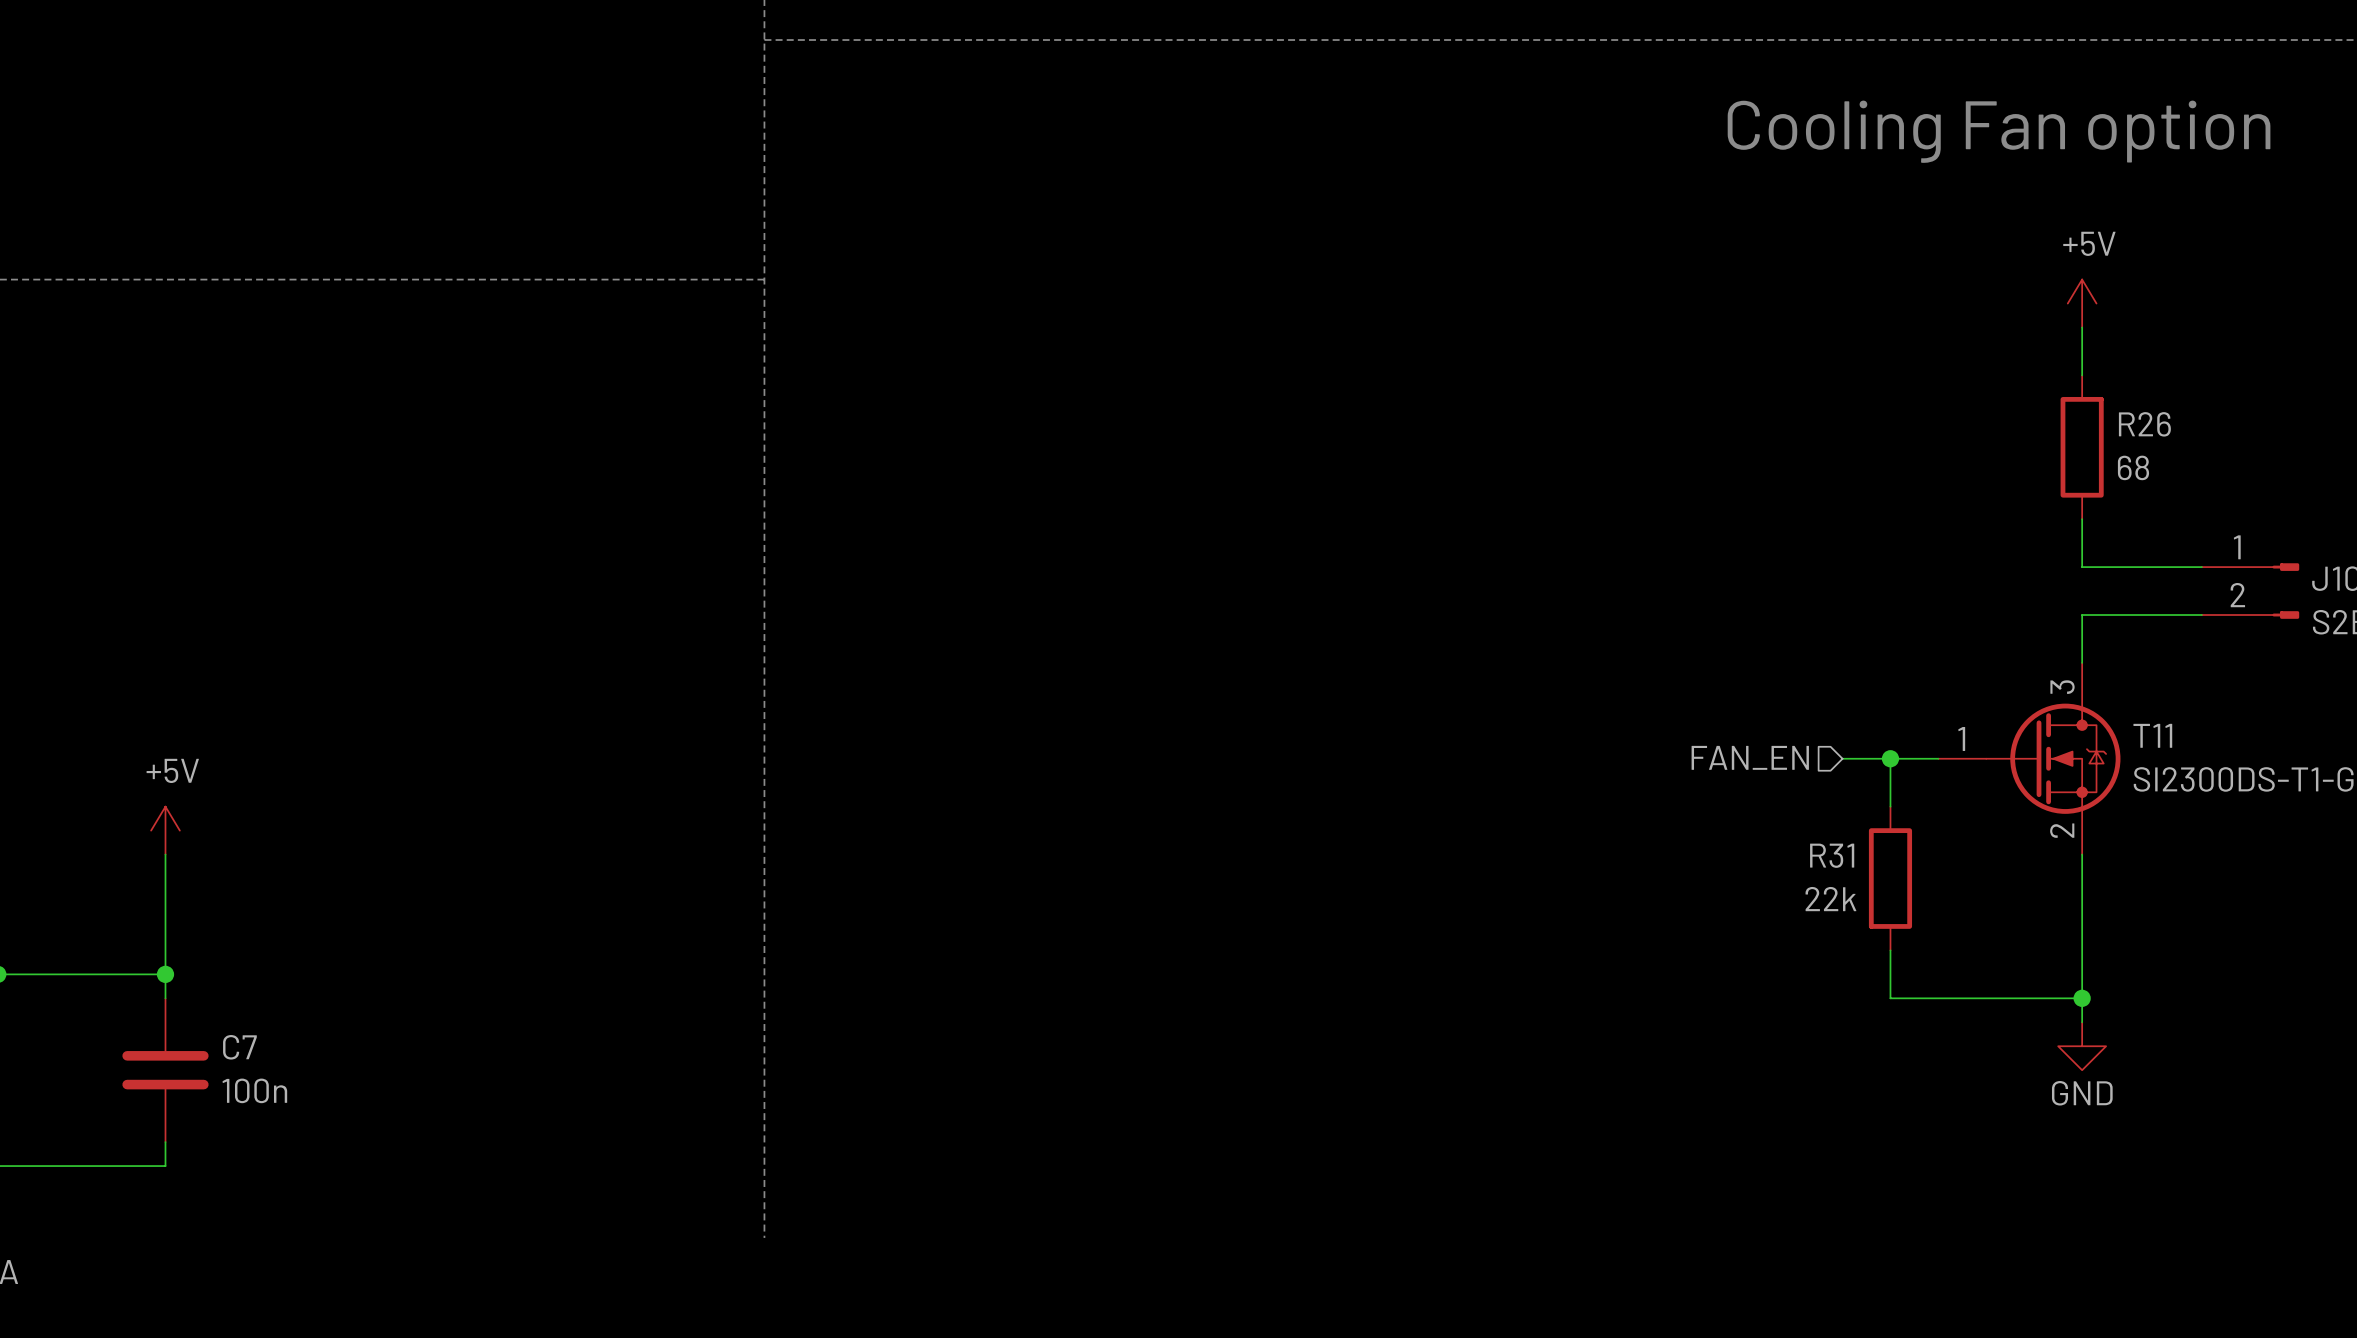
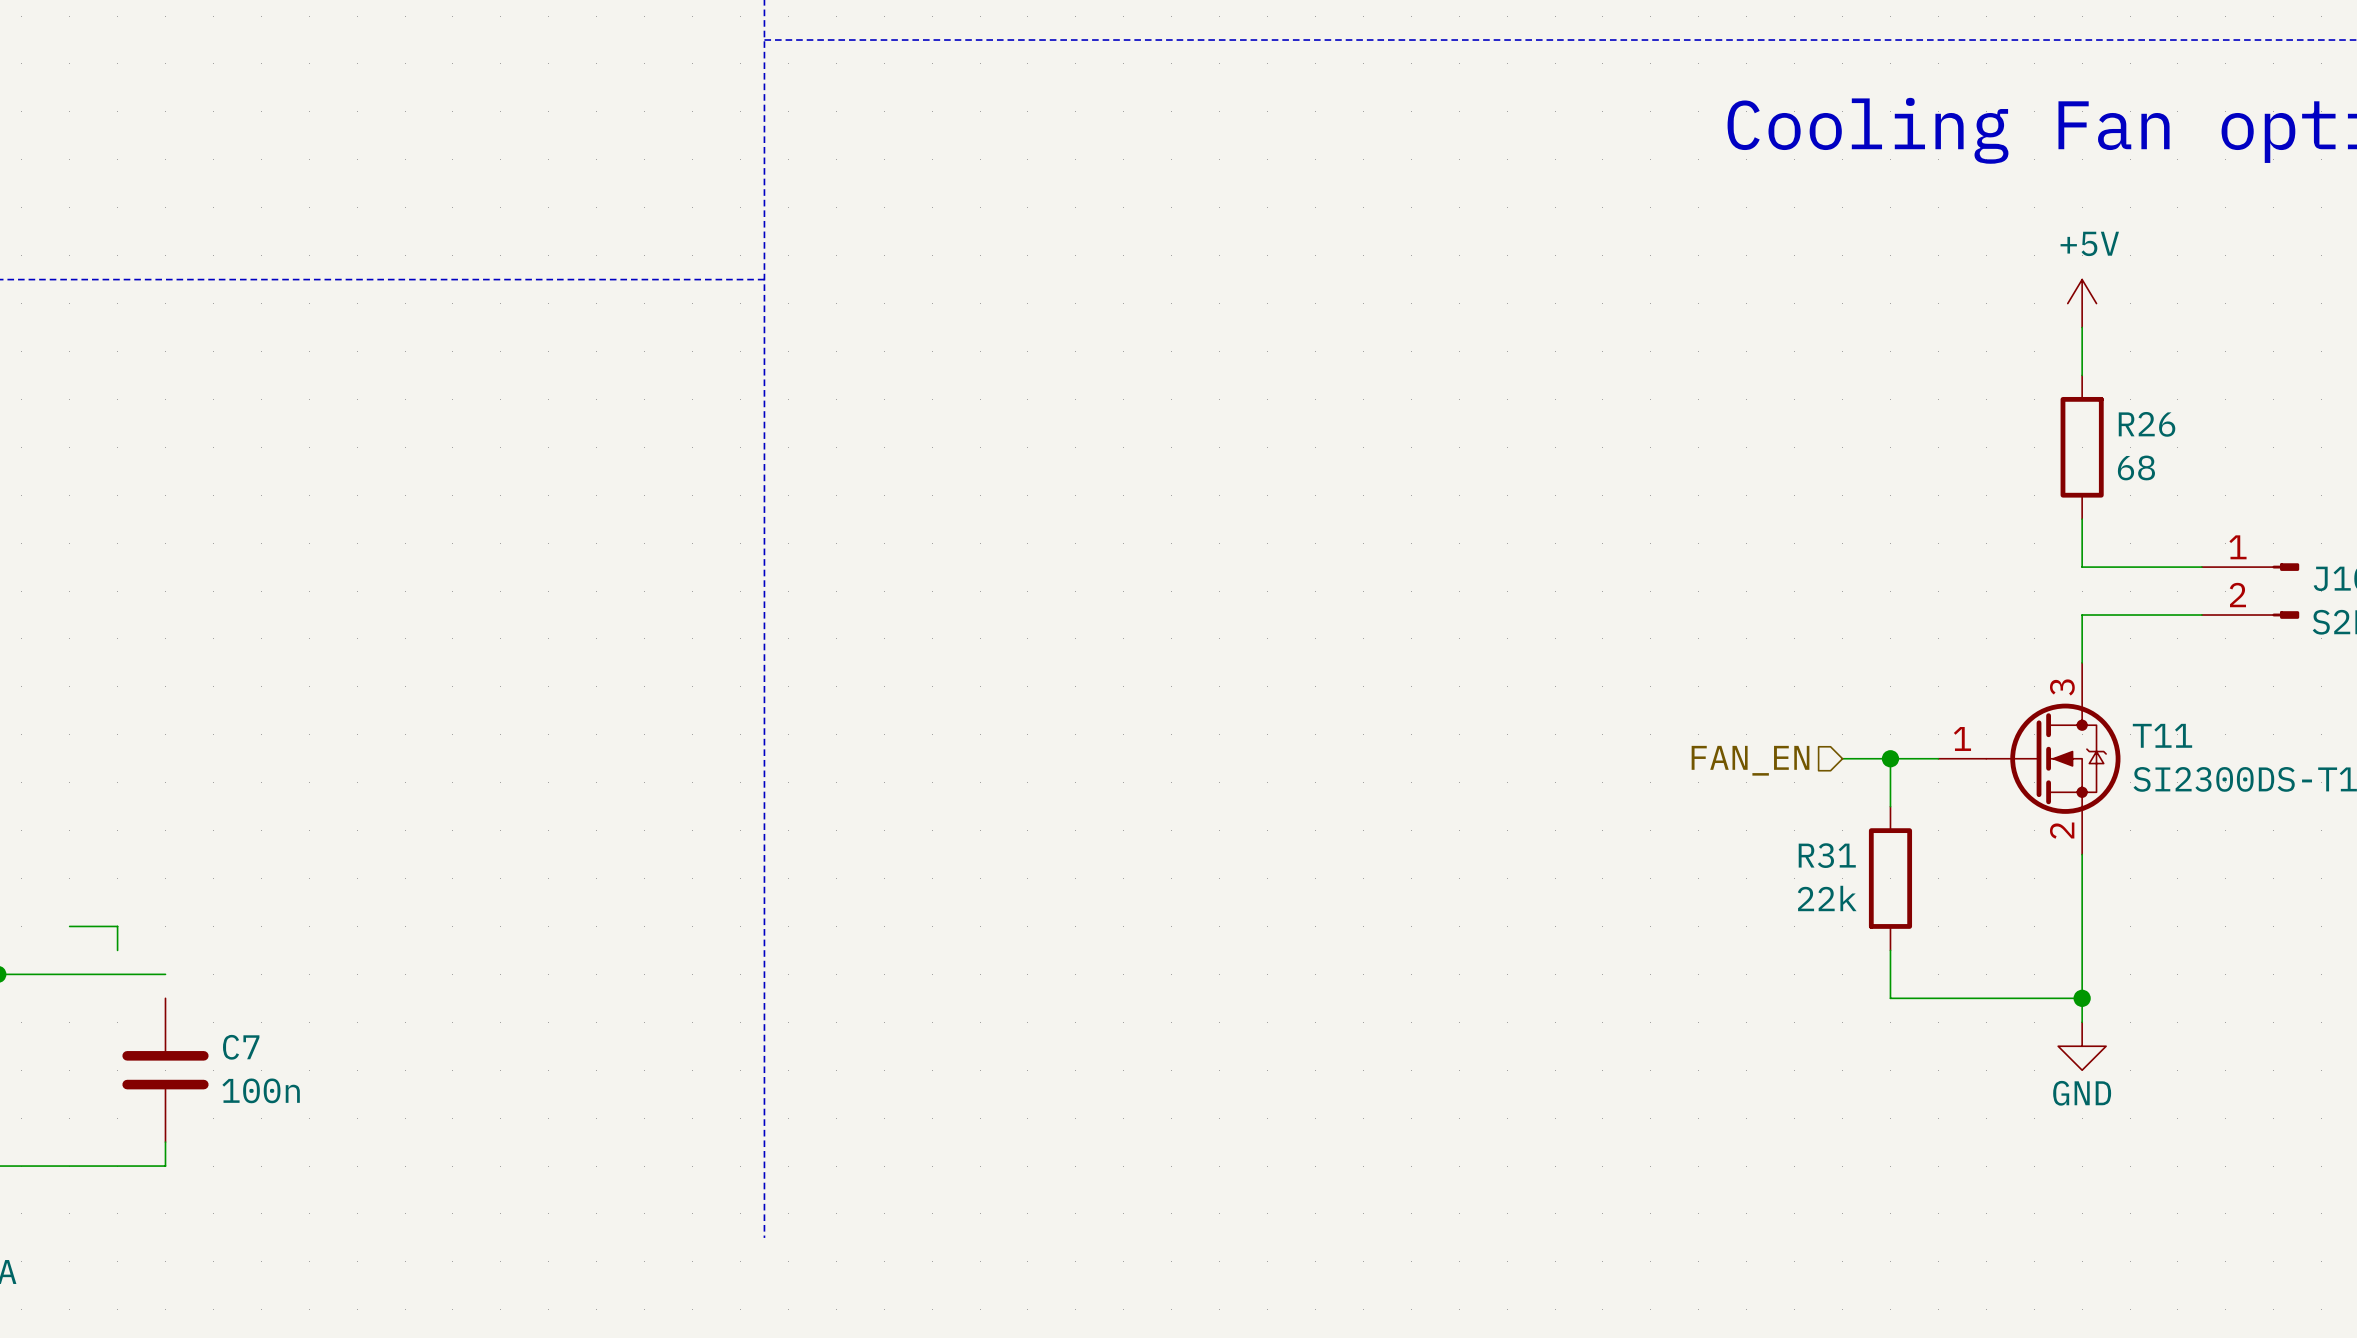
power symbol: +5V (165, 830) -> none
wire: (165, 854) (165, 998) -> none
wire: none -> (69, 926) (117, 926) (117, 950)
junction: (165, 974) -> none

